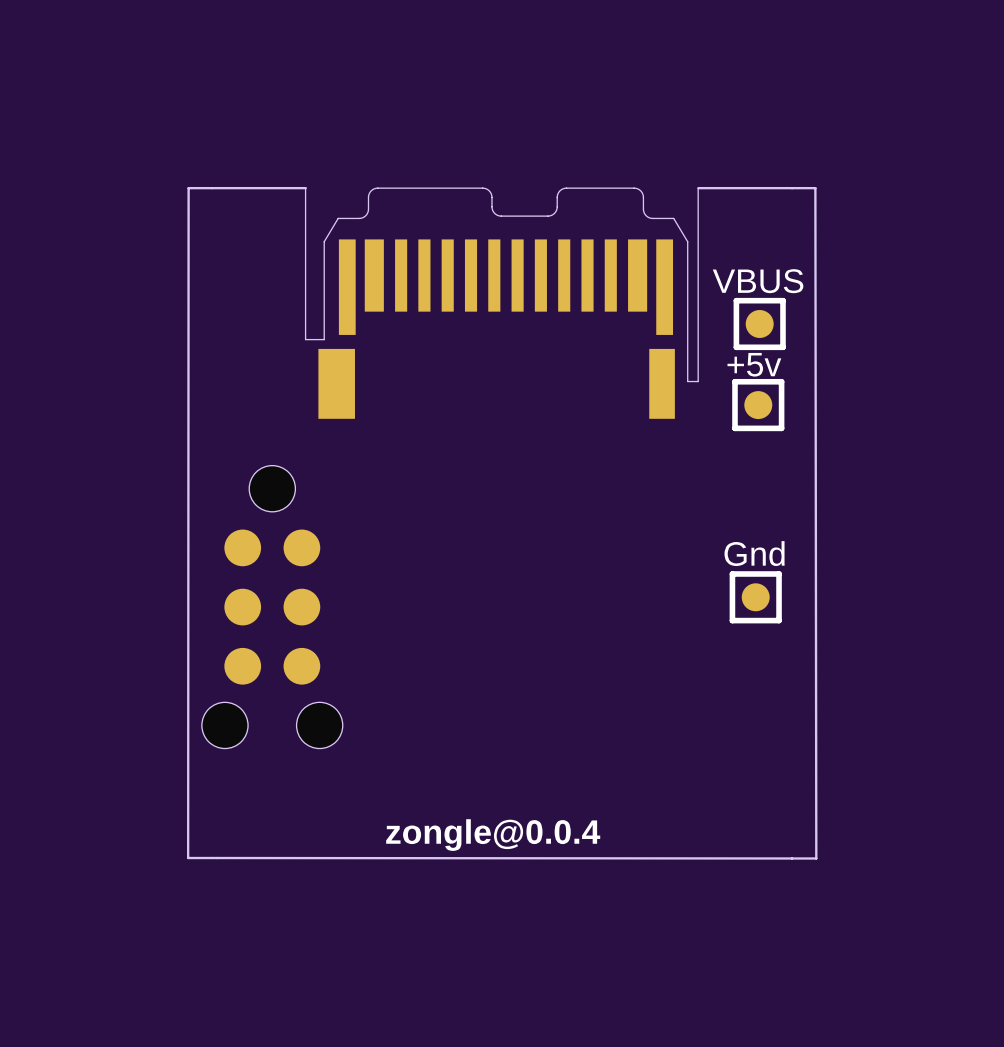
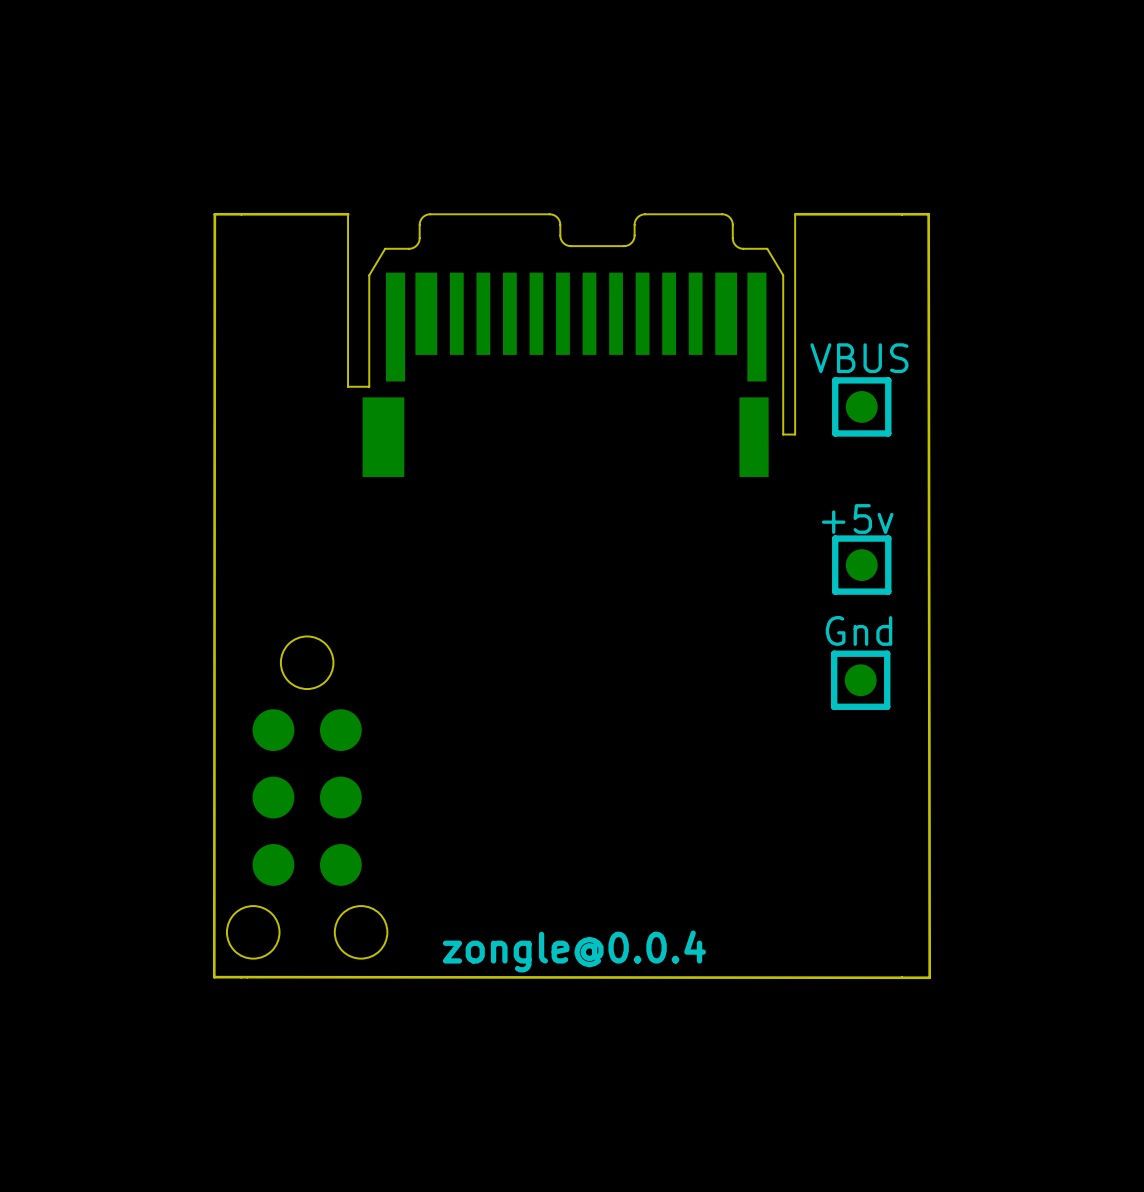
part position: (759, 323) -> (861, 406)
part position: (758, 405) -> (861, 565)
part position: (272, 607) -> (307, 797)

